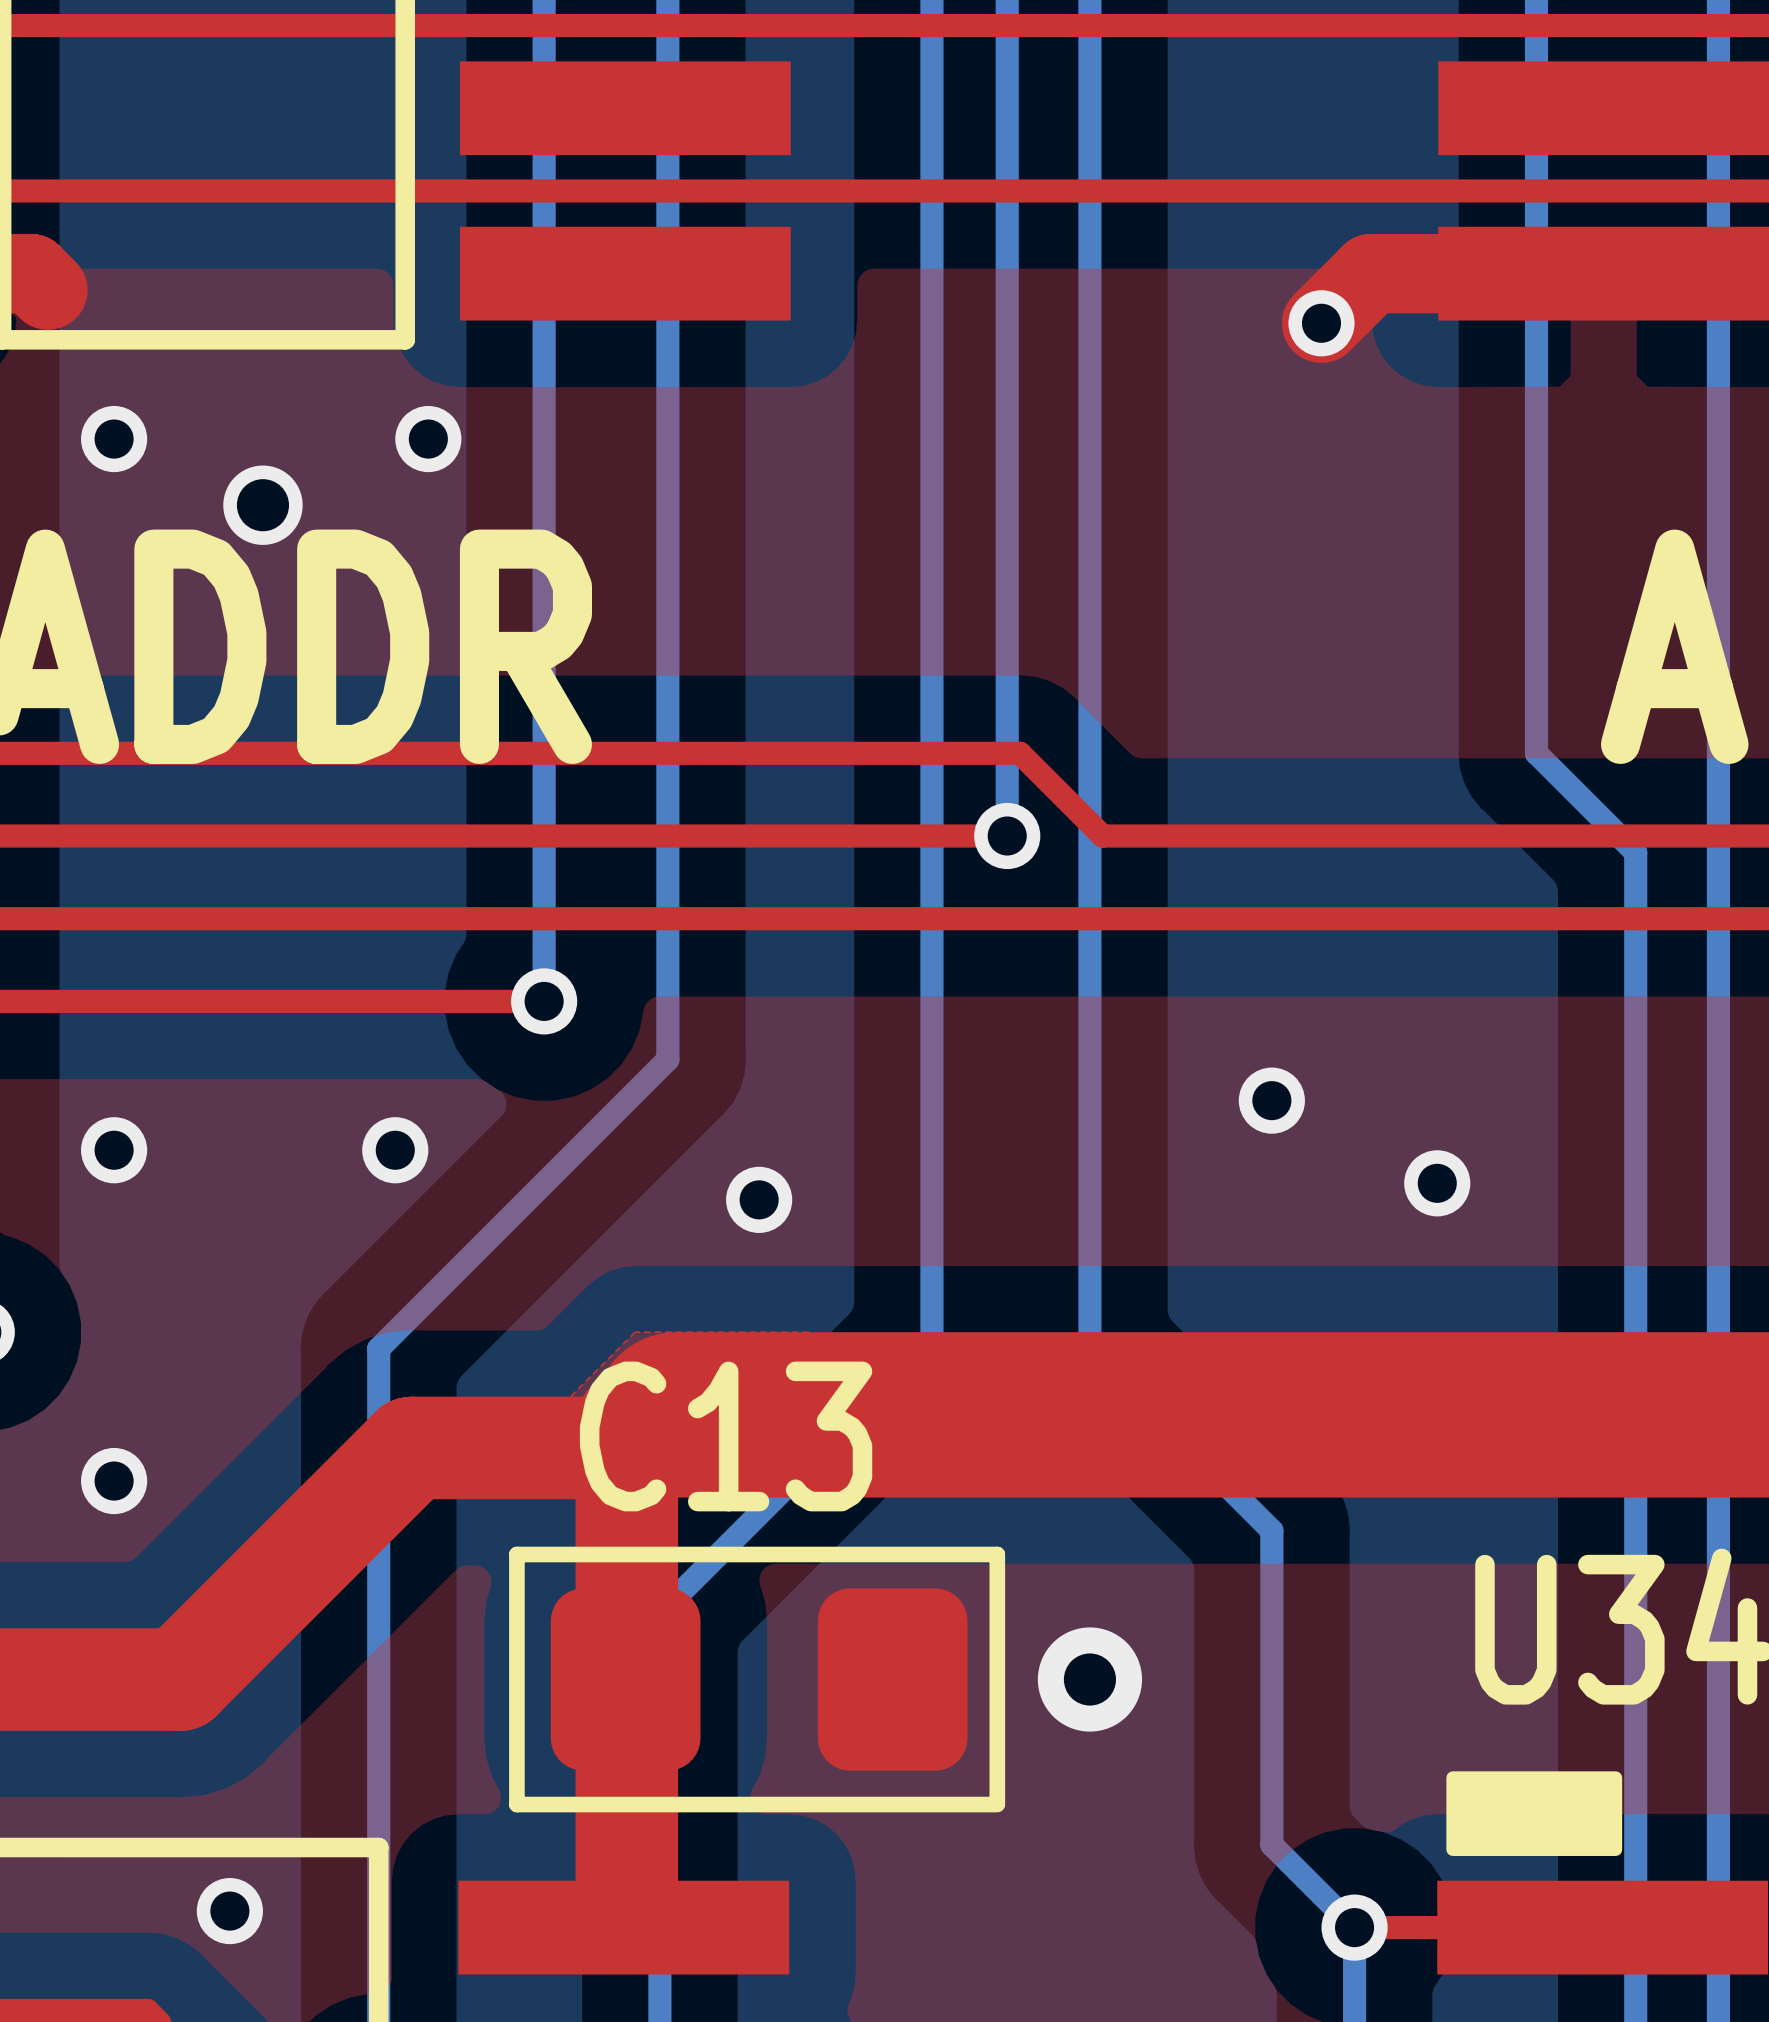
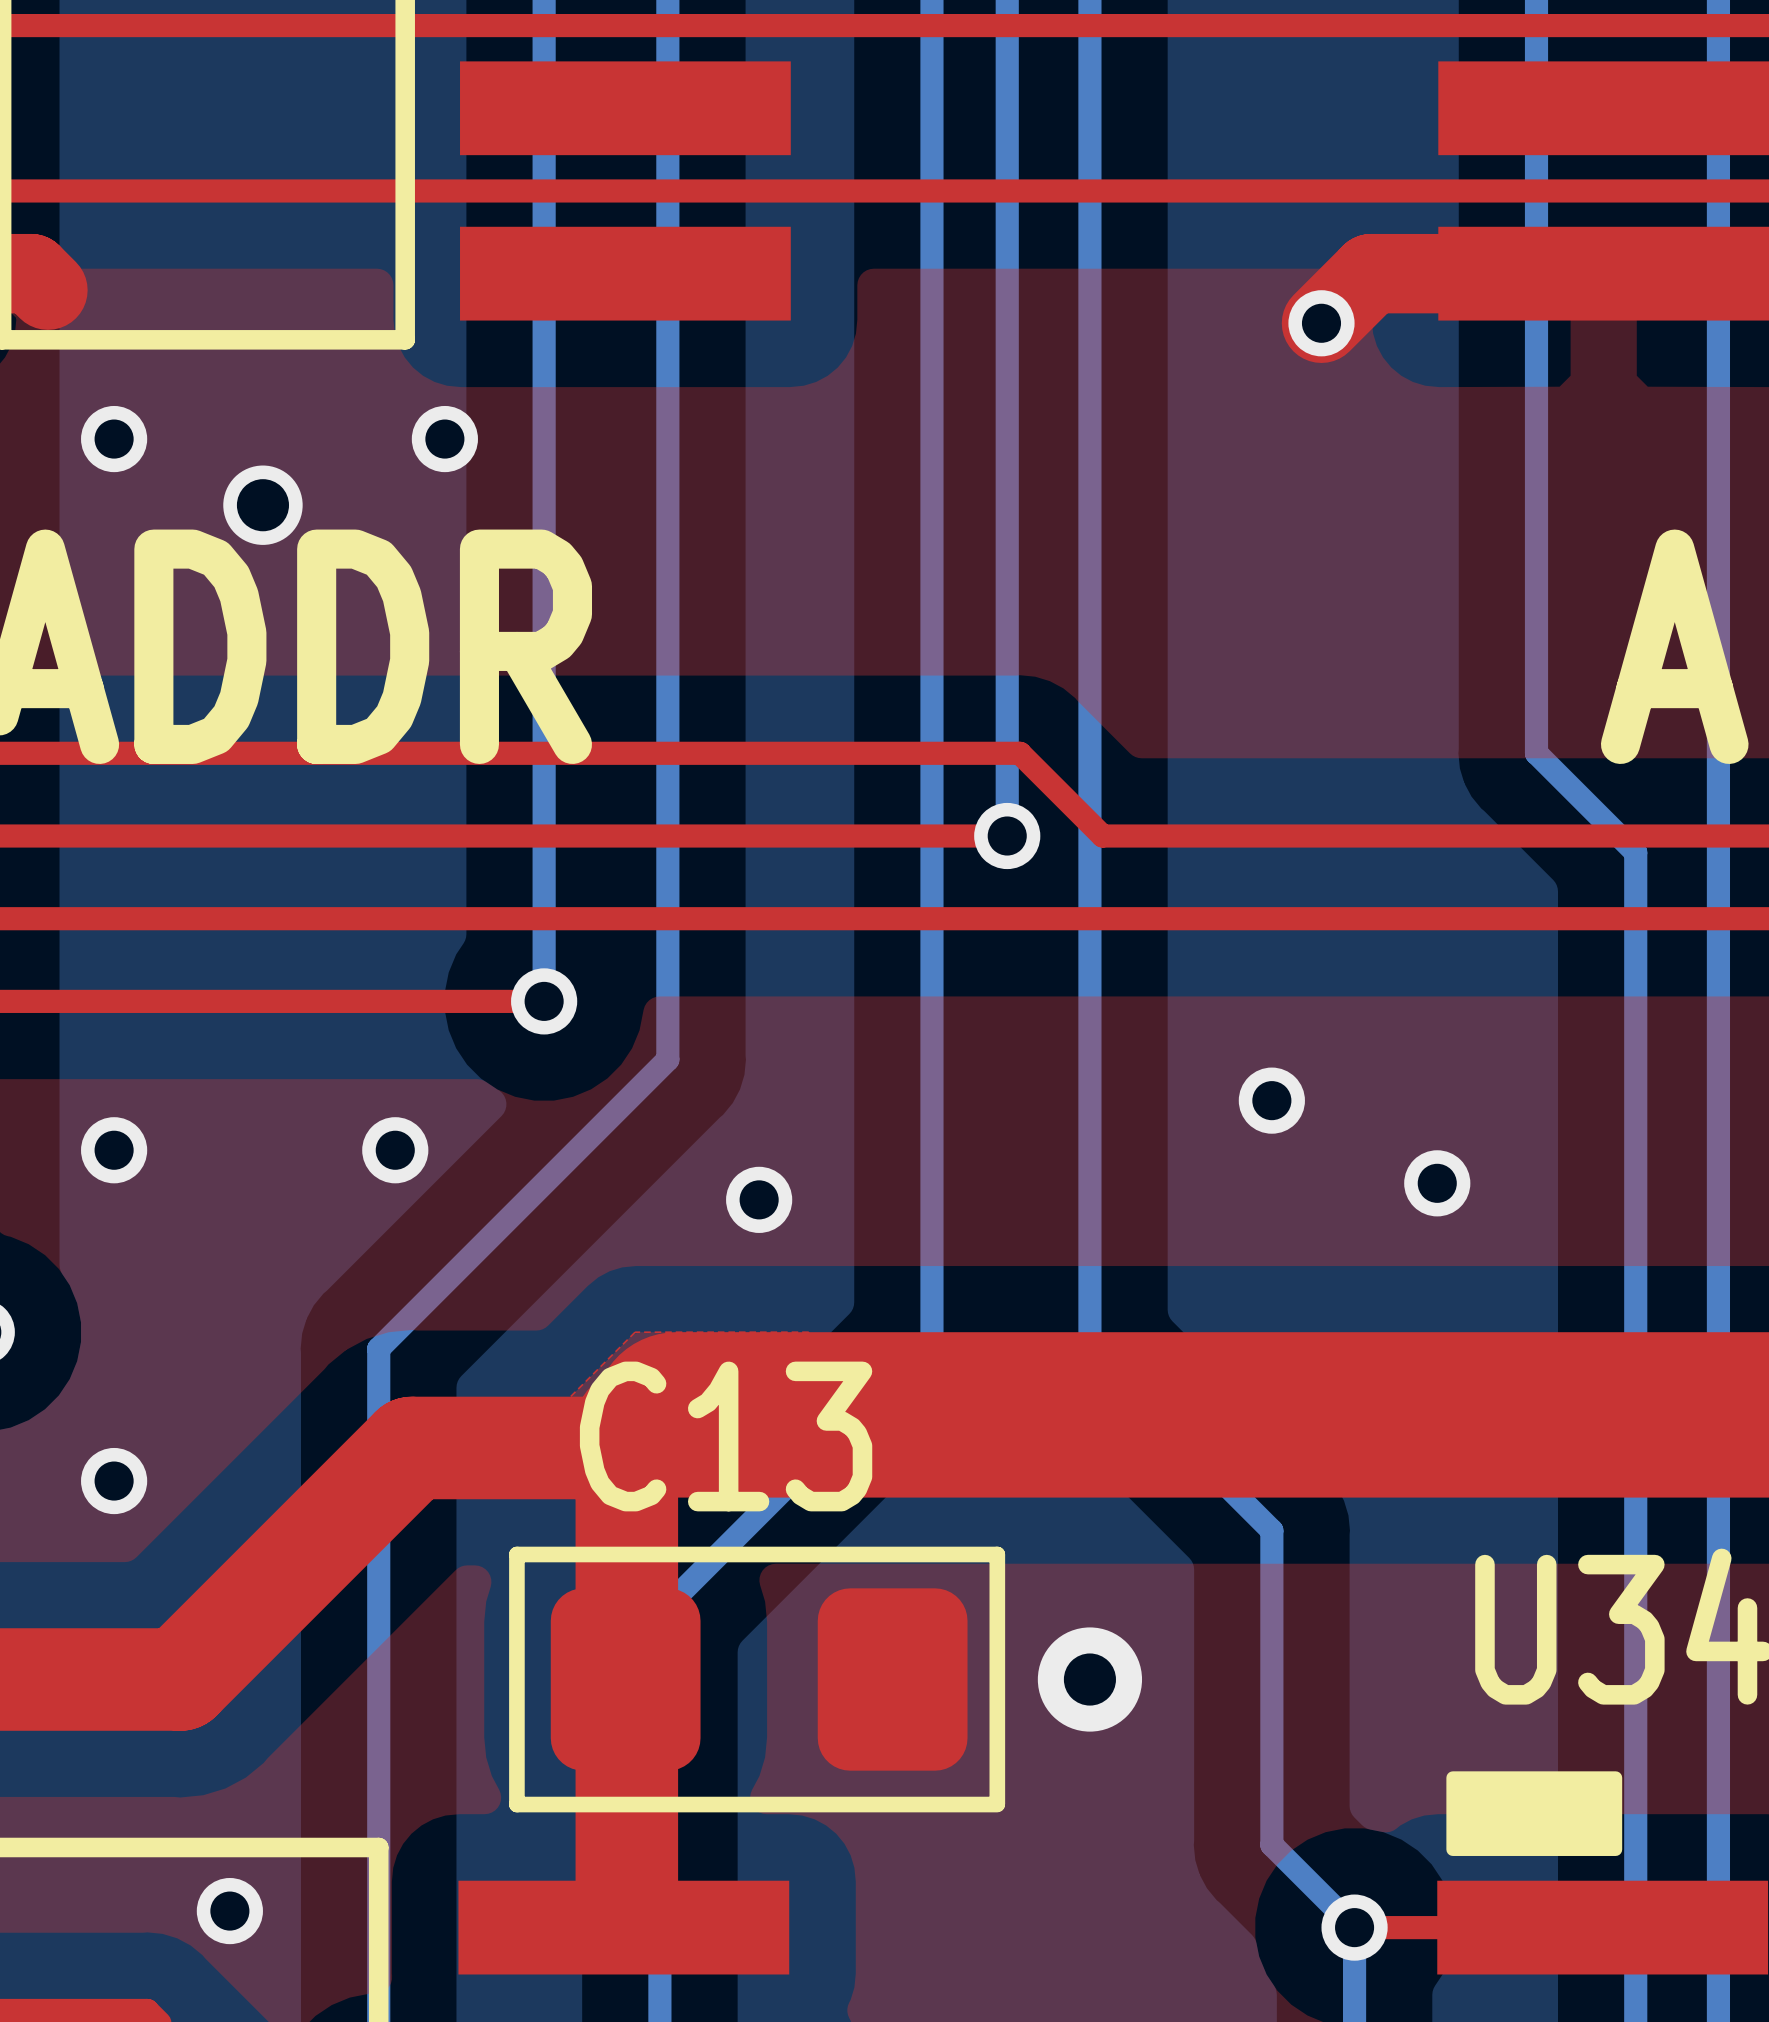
via position: (428, 439) -> (444, 439)

